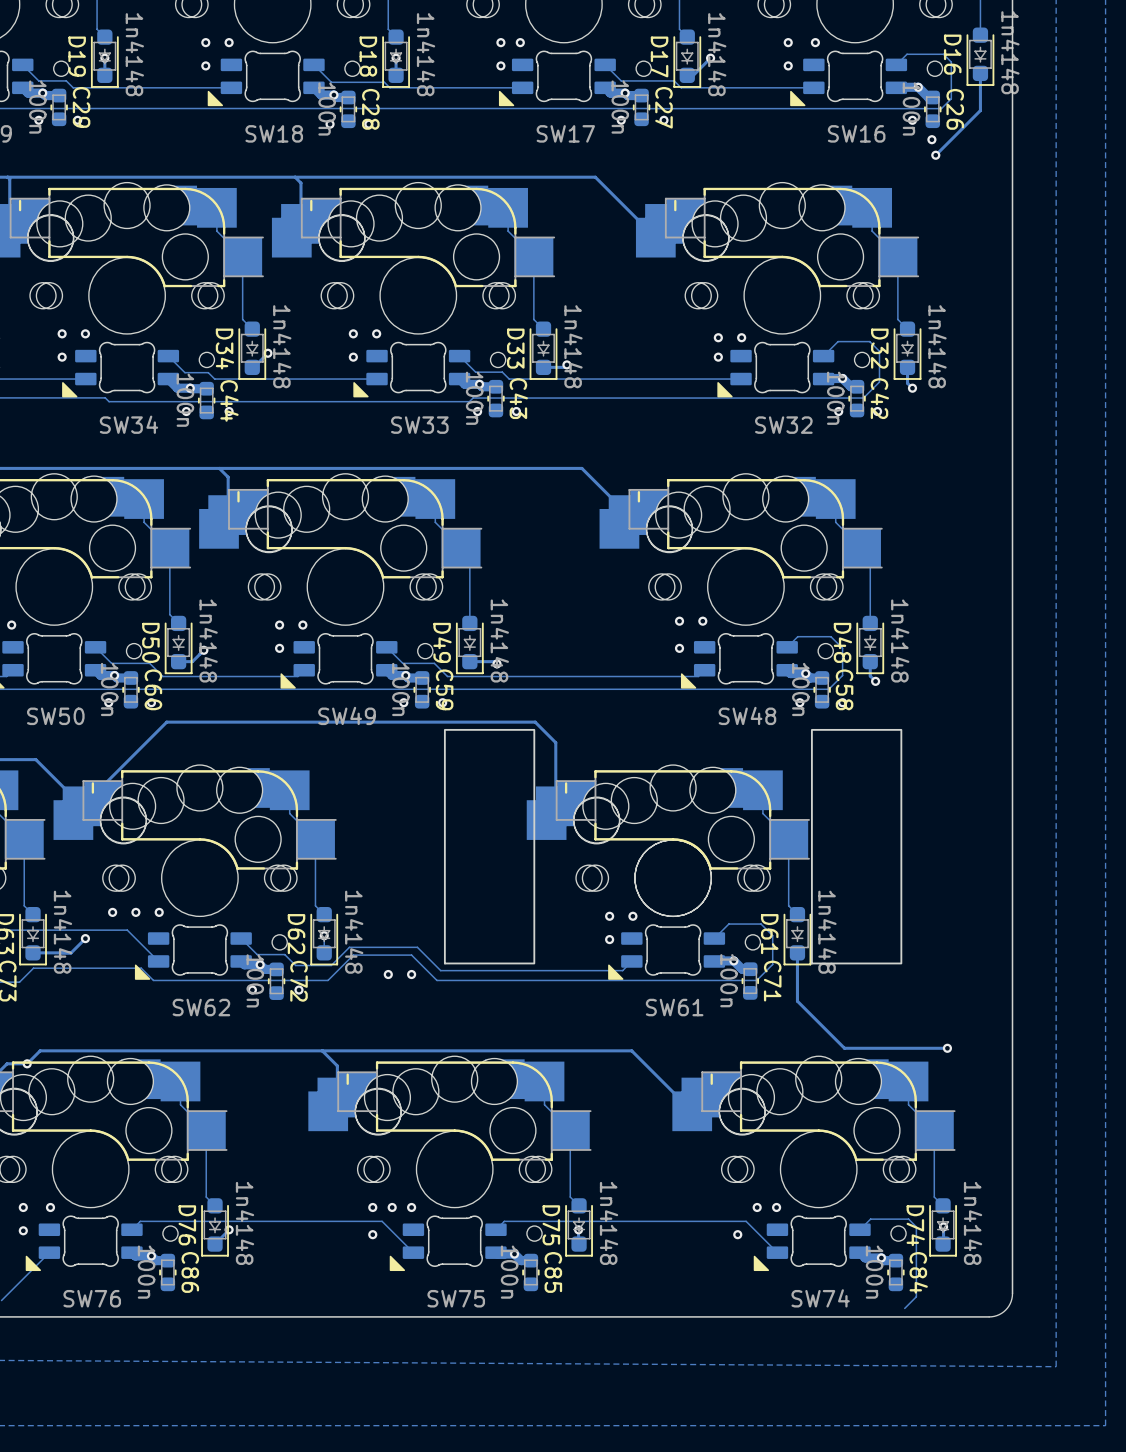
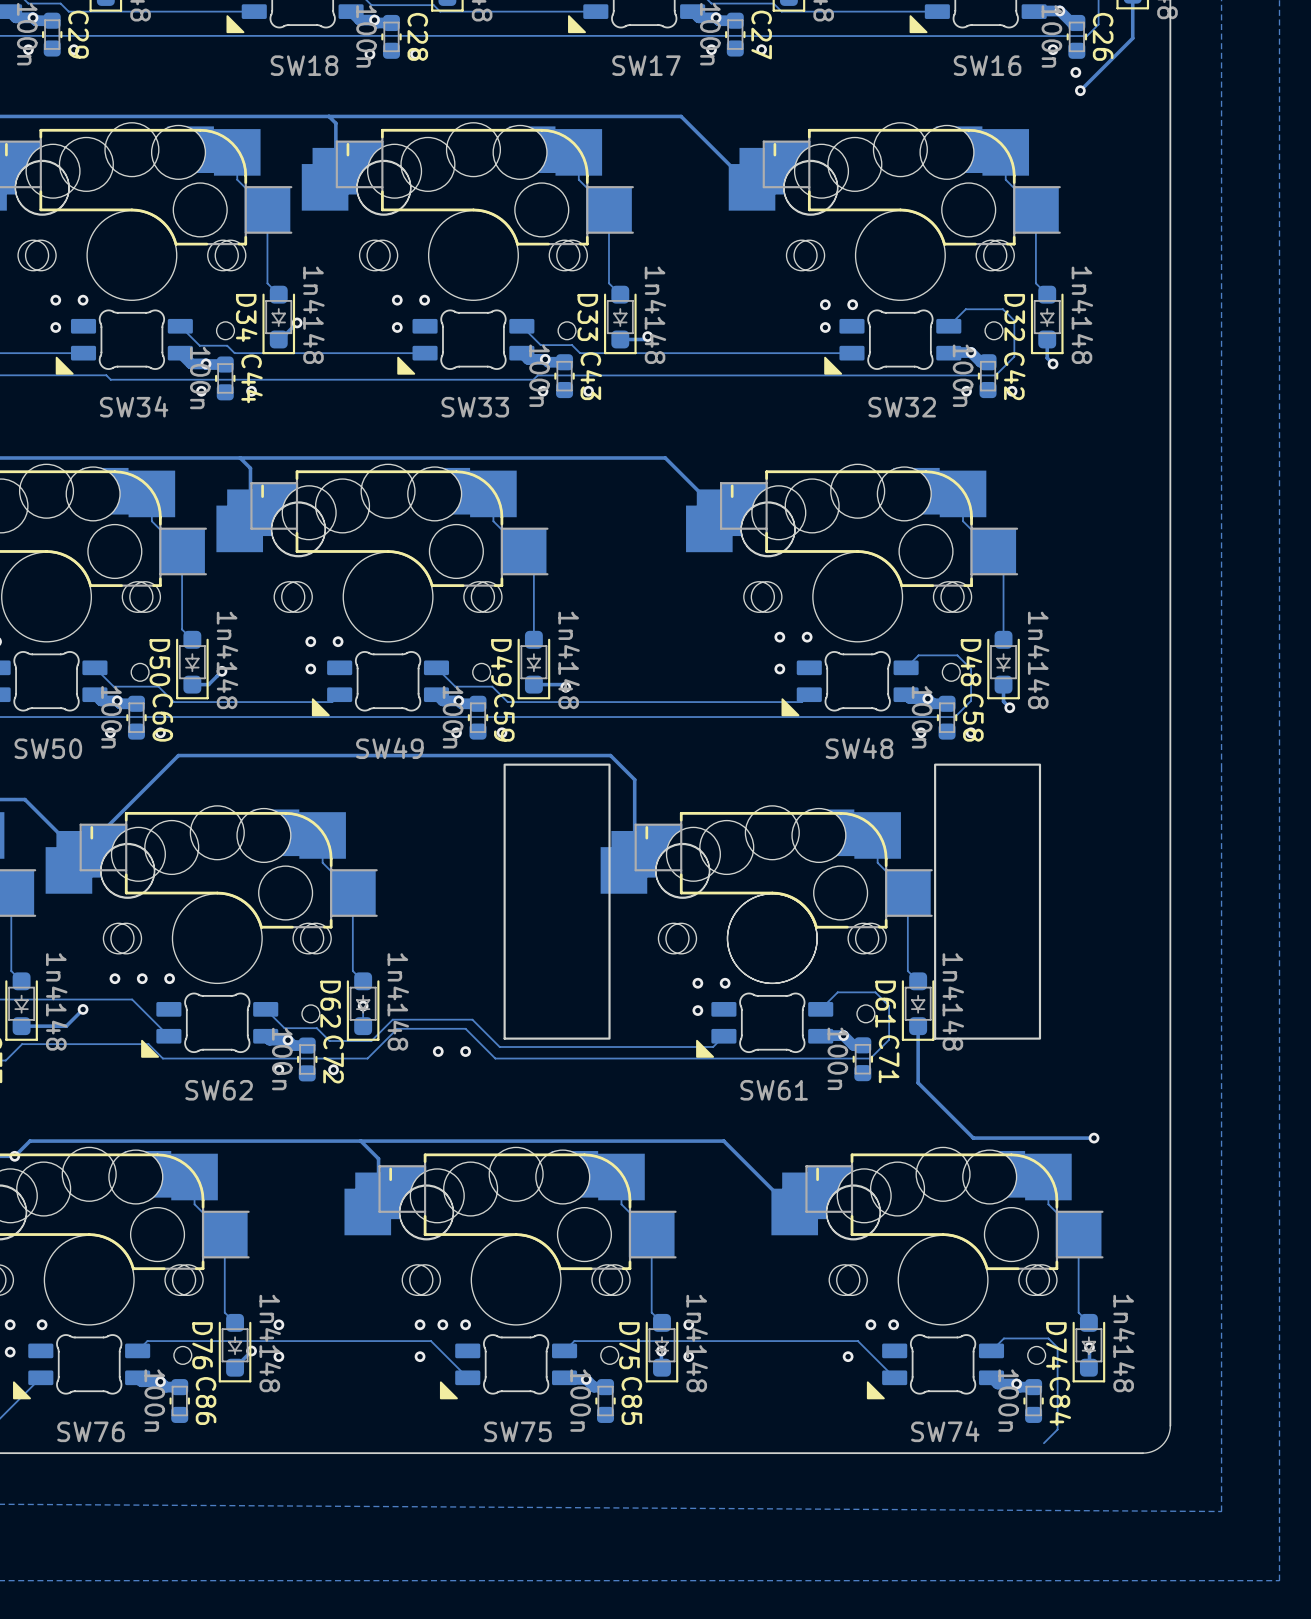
via: none -> (278, 1324)
via: none -> (688, 1324)
via: none -> (278, 1356)
via: none -> (688, 1356)

